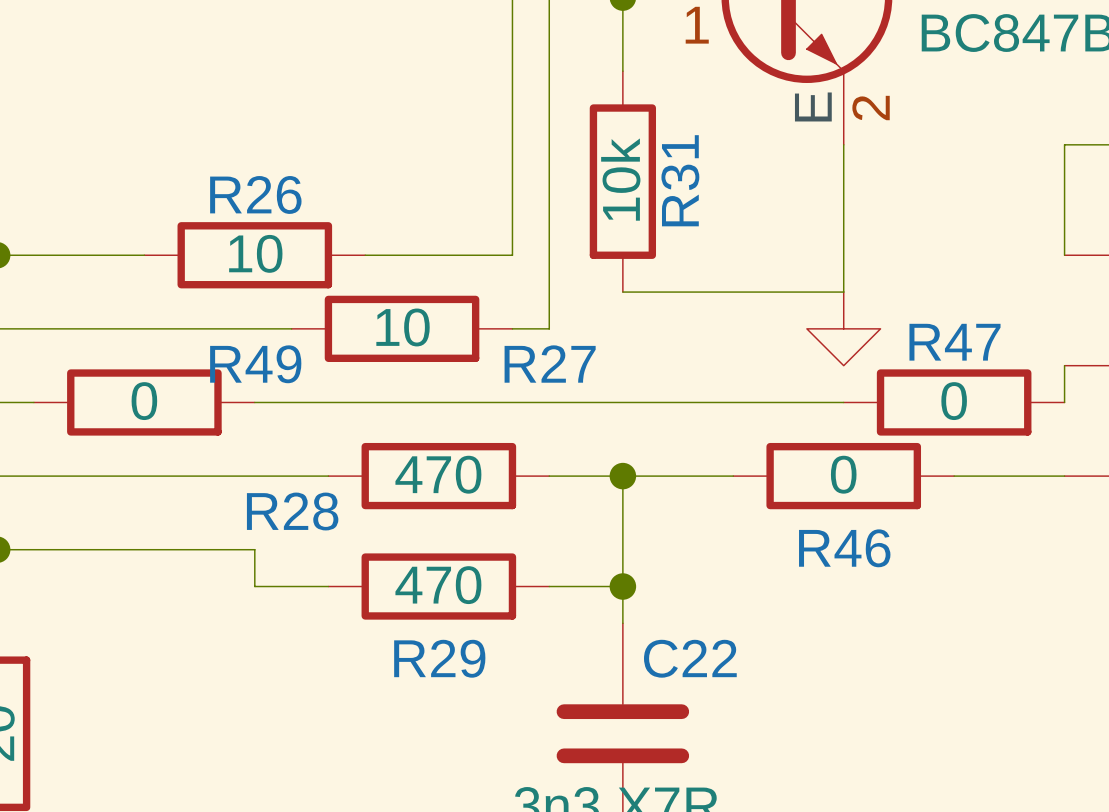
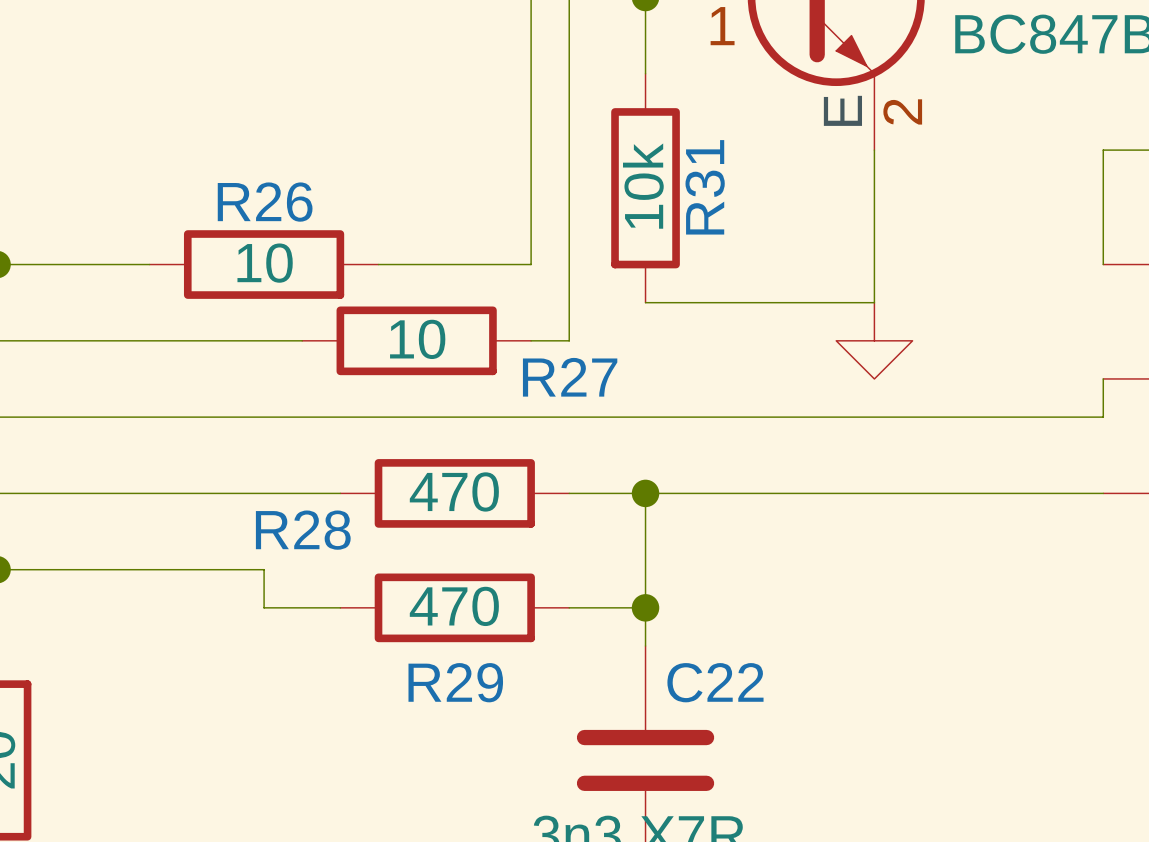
wire: none -> (35, 417) (264, 417)
R49: 0 (144, 402) -> none
wire: none -> (874, 417) (1103, 417)
R47: 0 (954, 402) -> none
wire: none -> (759, 493) (988, 493)
R46: 0 (843, 476) -> none

